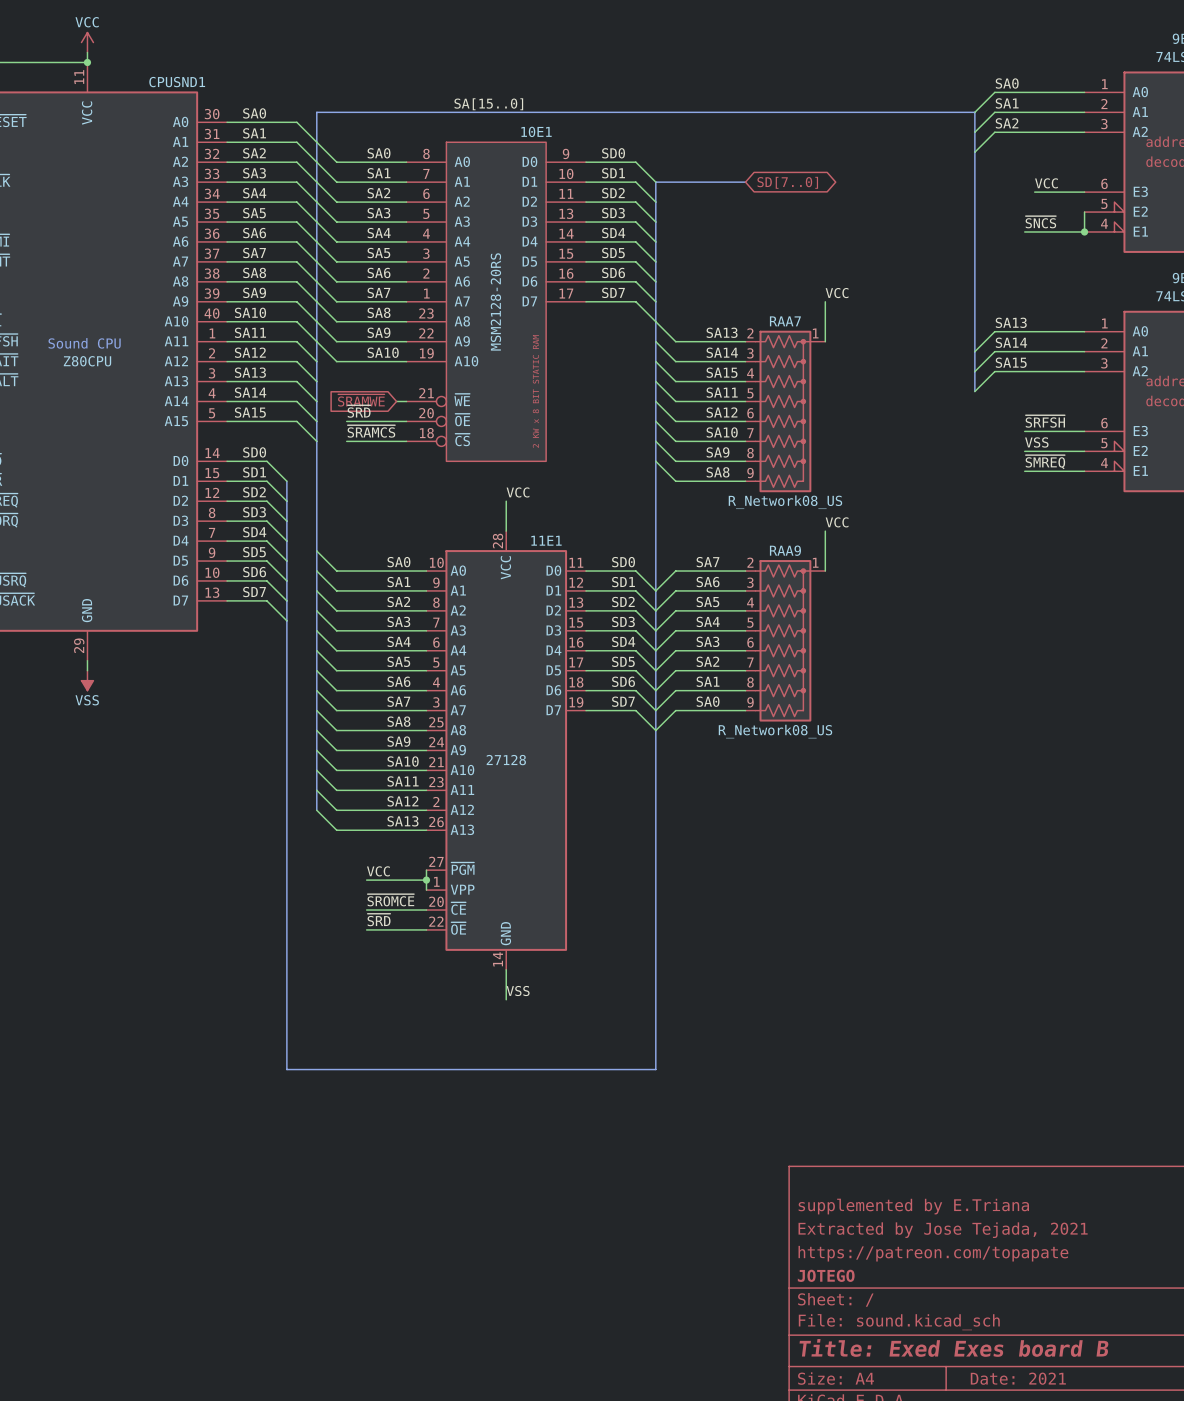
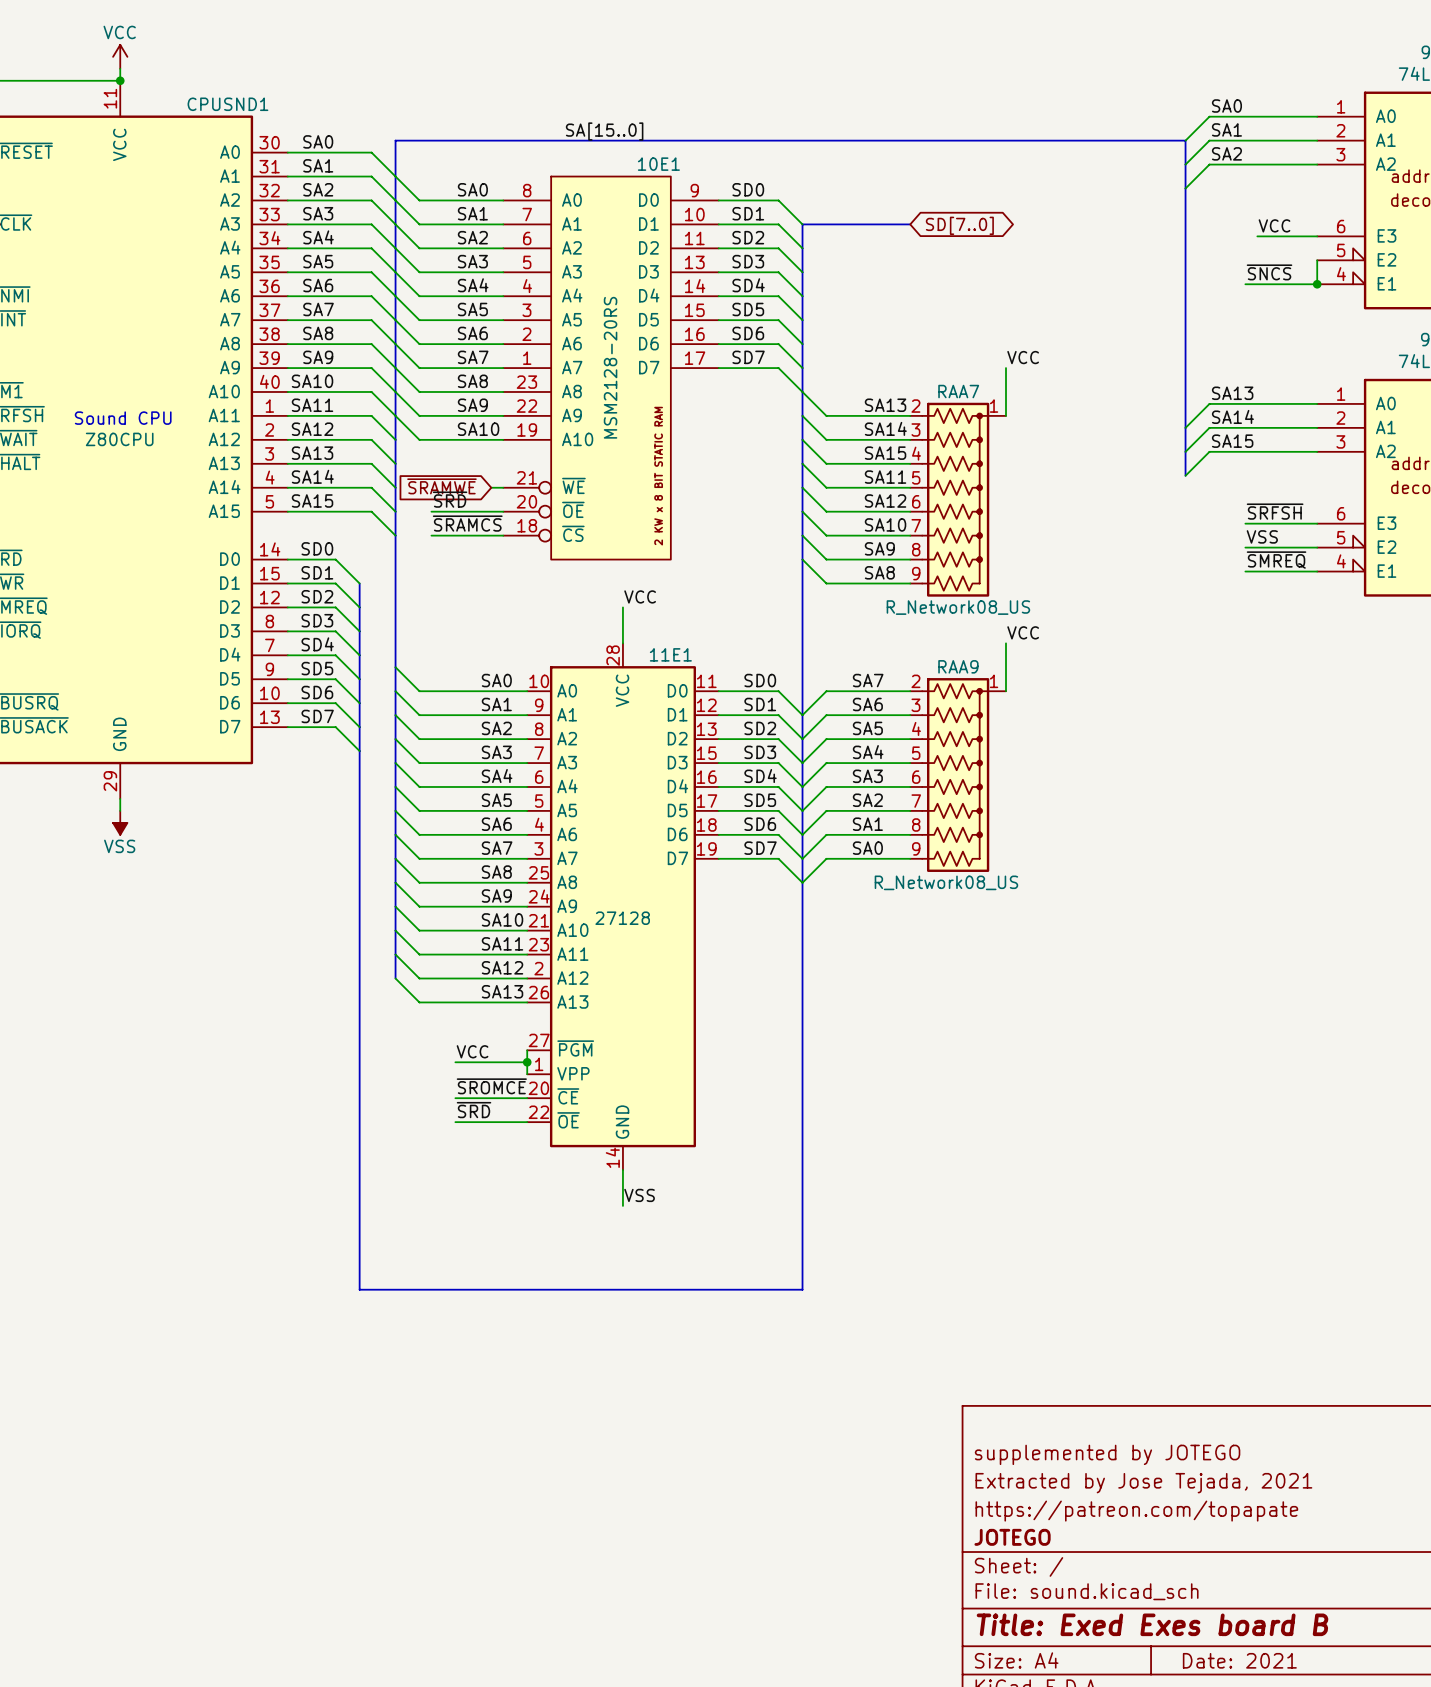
title block: supplemented by E.Triana (913, 1206) -> supplemented by JOTEGO (1107, 1454)

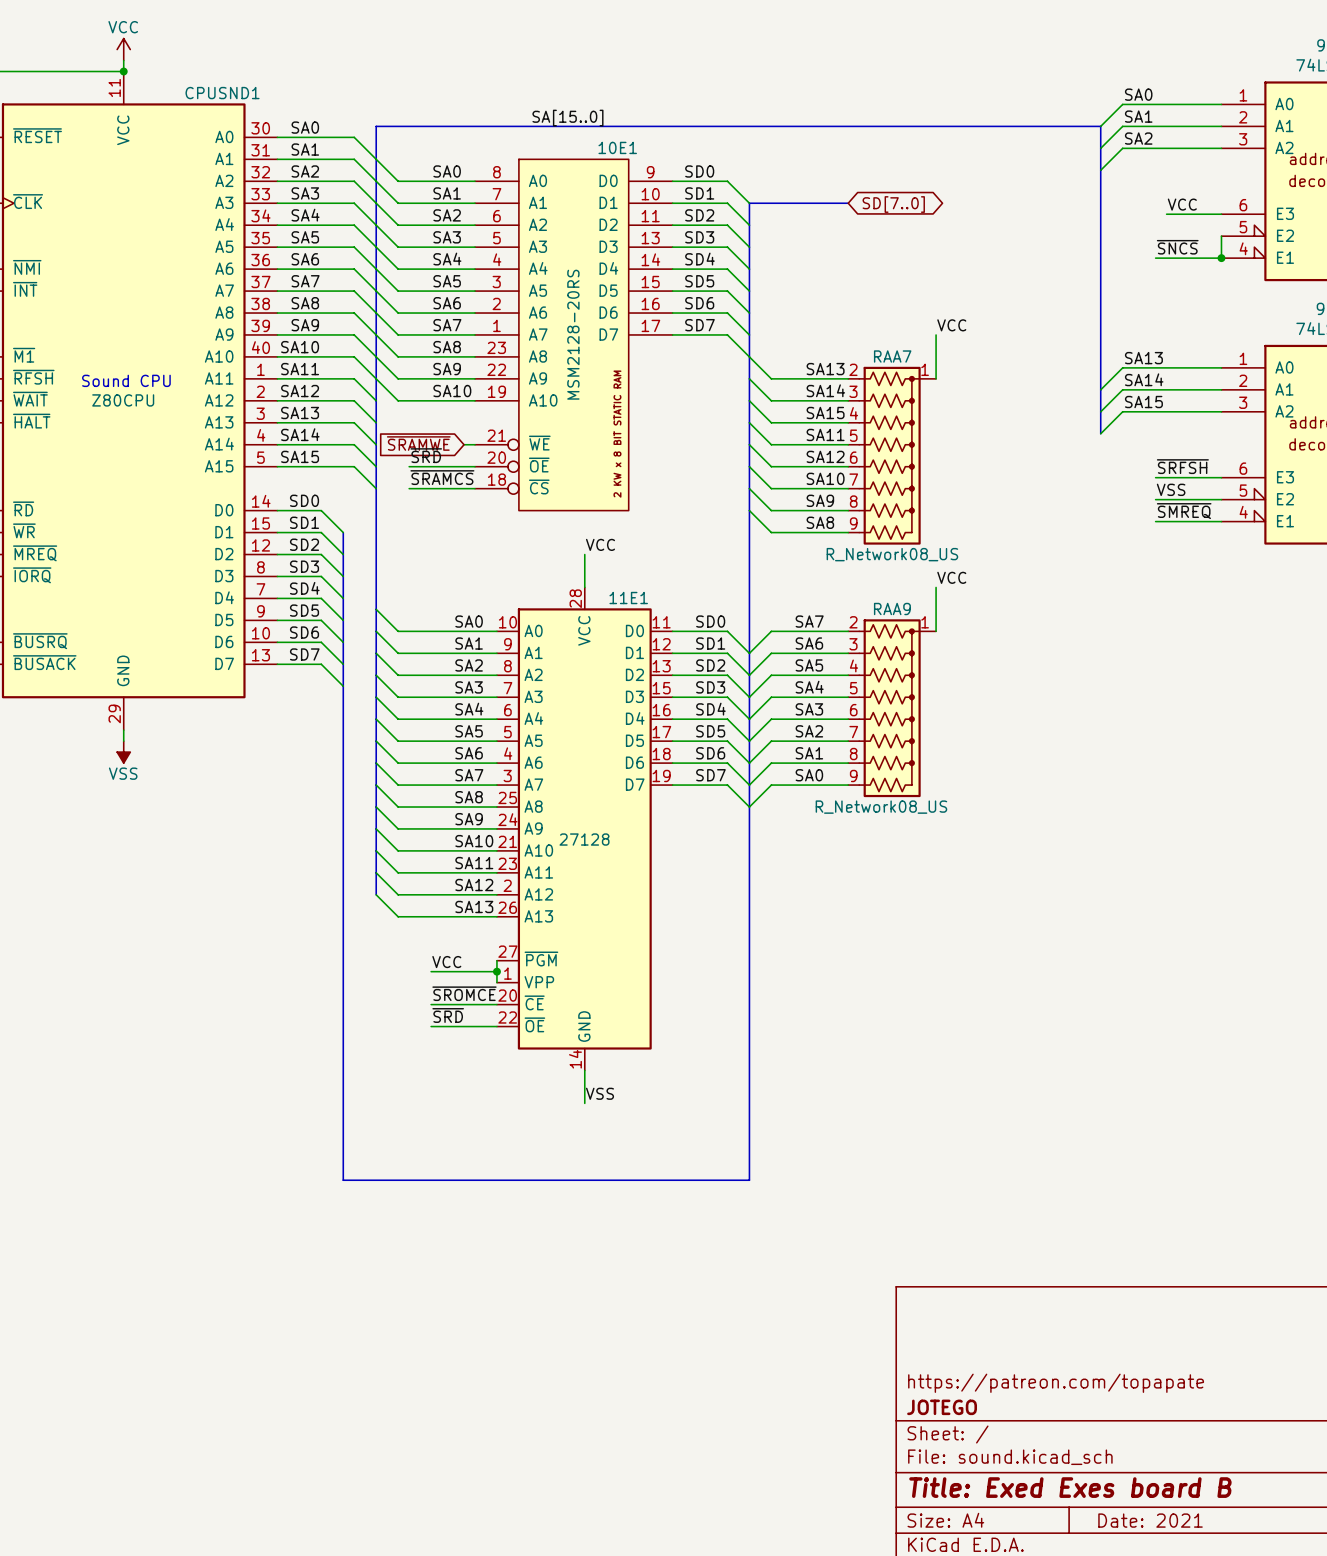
title block: supplemented by JOTEGO (1107, 1454) -> none
title block: Extracted by Jose Tejada, 2021 (1143, 1483) -> none

